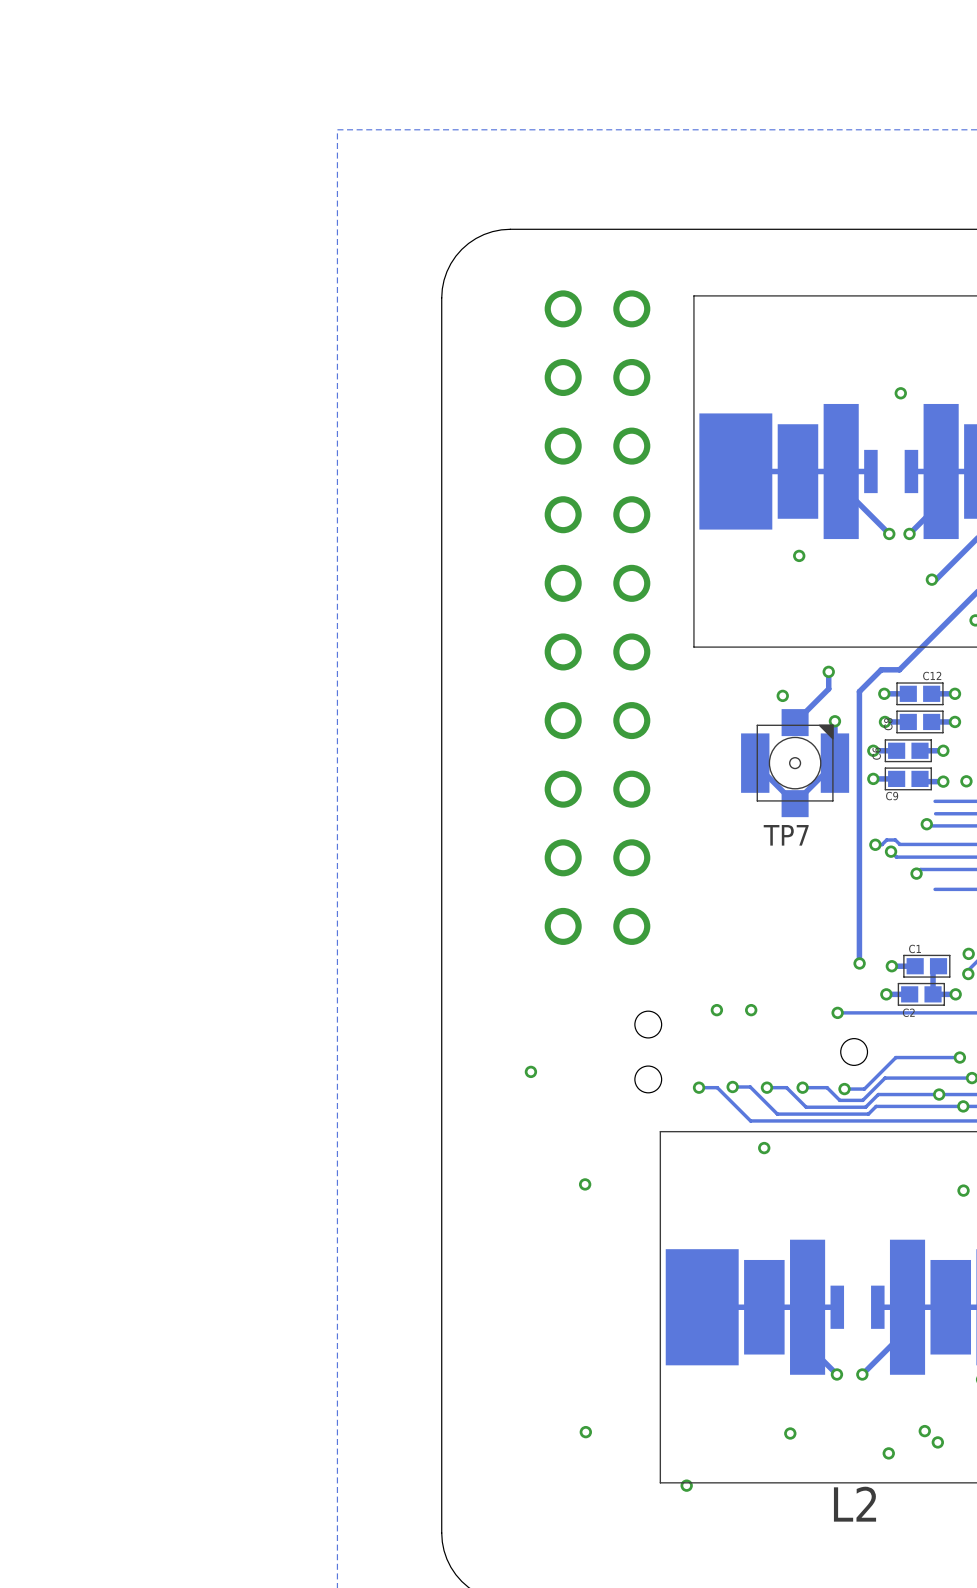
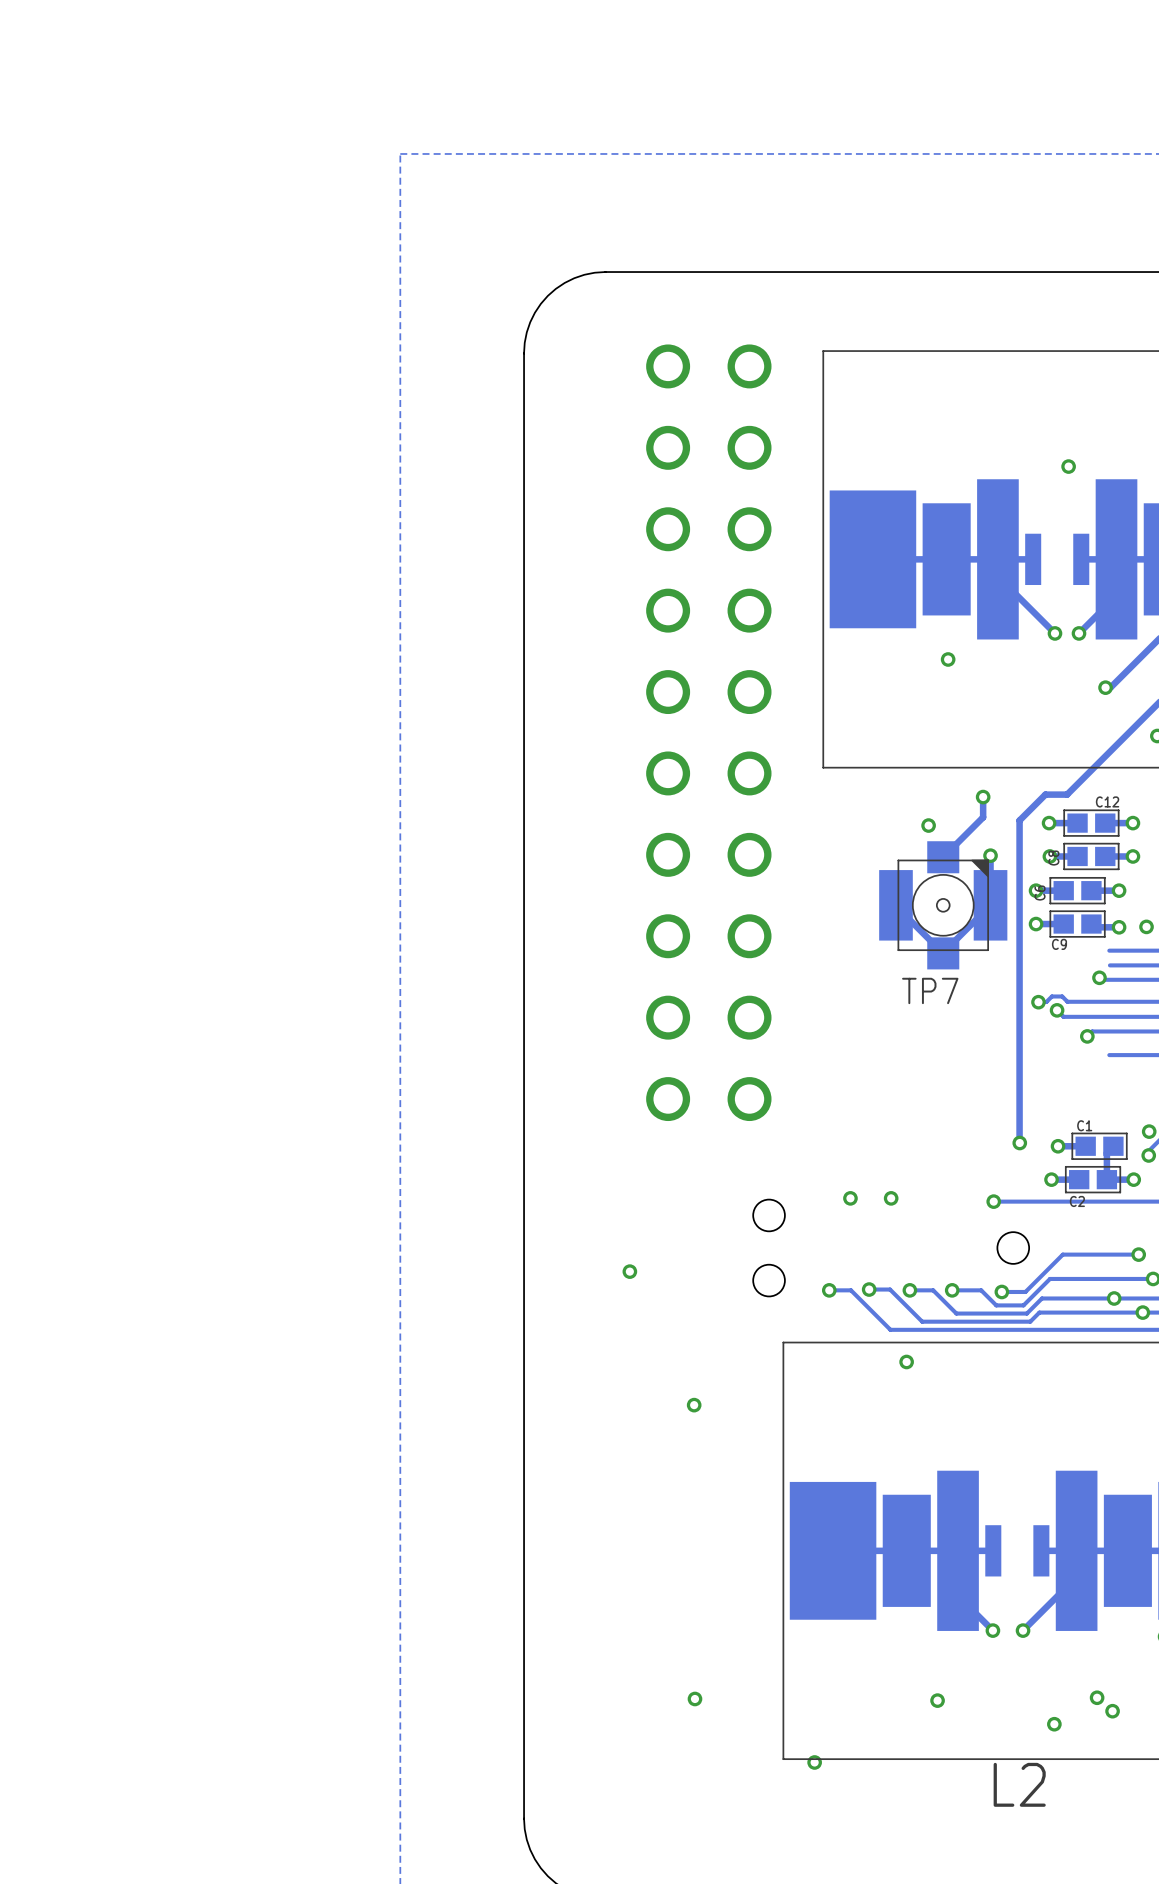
via: (963, 1190) -> none

